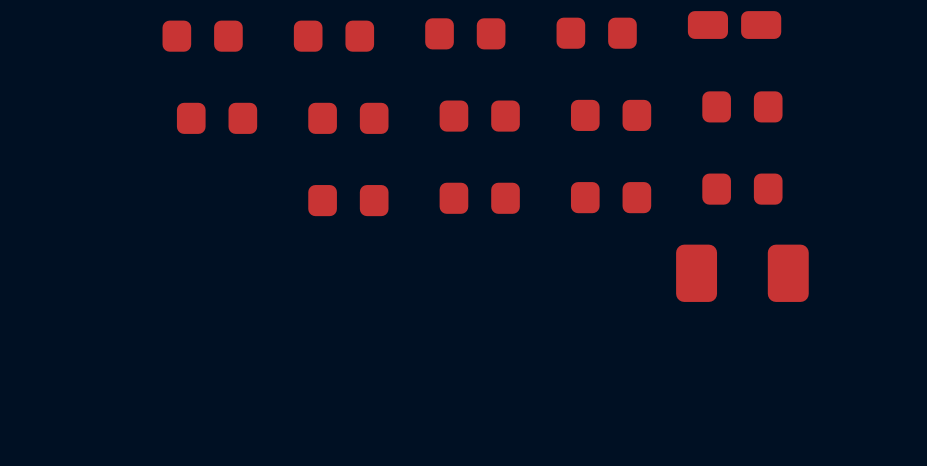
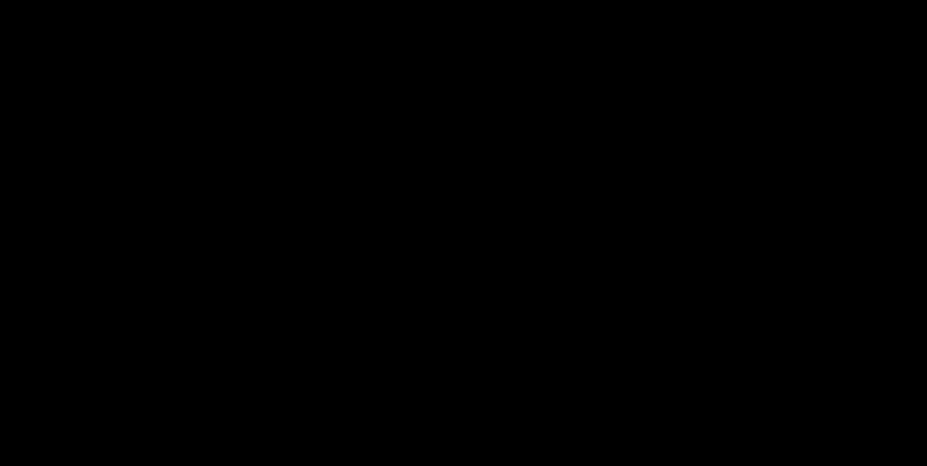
part: (734, 25) -> none
part: (465, 33) -> none
part: (596, 33) -> none
part: (202, 36) -> none
part: (333, 36) -> none
part: (742, 106) -> none
part: (611, 115) -> none
part: (479, 116) -> none
part: (217, 118) -> none
part: (348, 118) -> none
part: (742, 189) -> none
part: (611, 197) -> none
part: (479, 198) -> none
part: (348, 200) -> none
part: (742, 273) -> none

